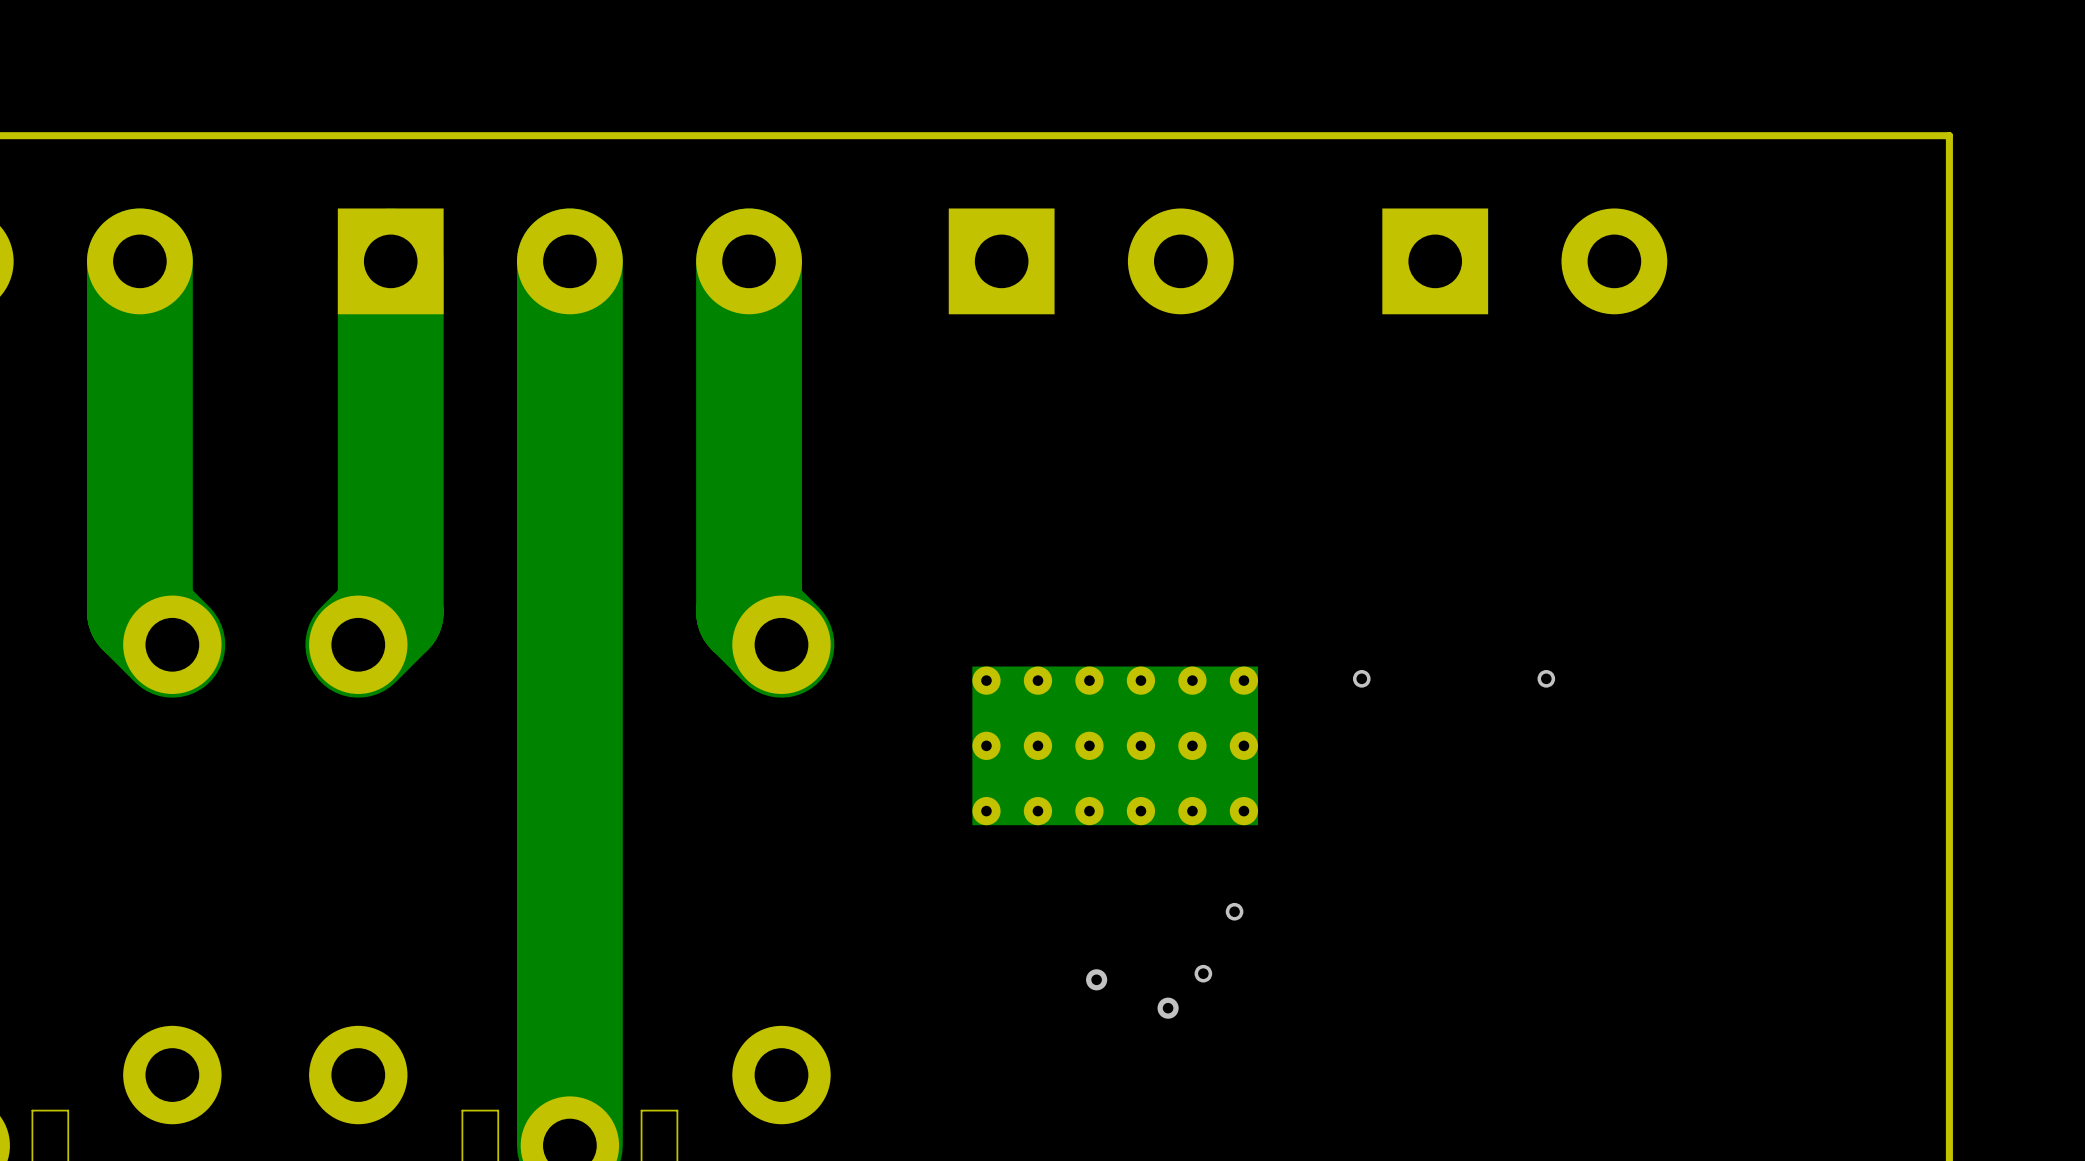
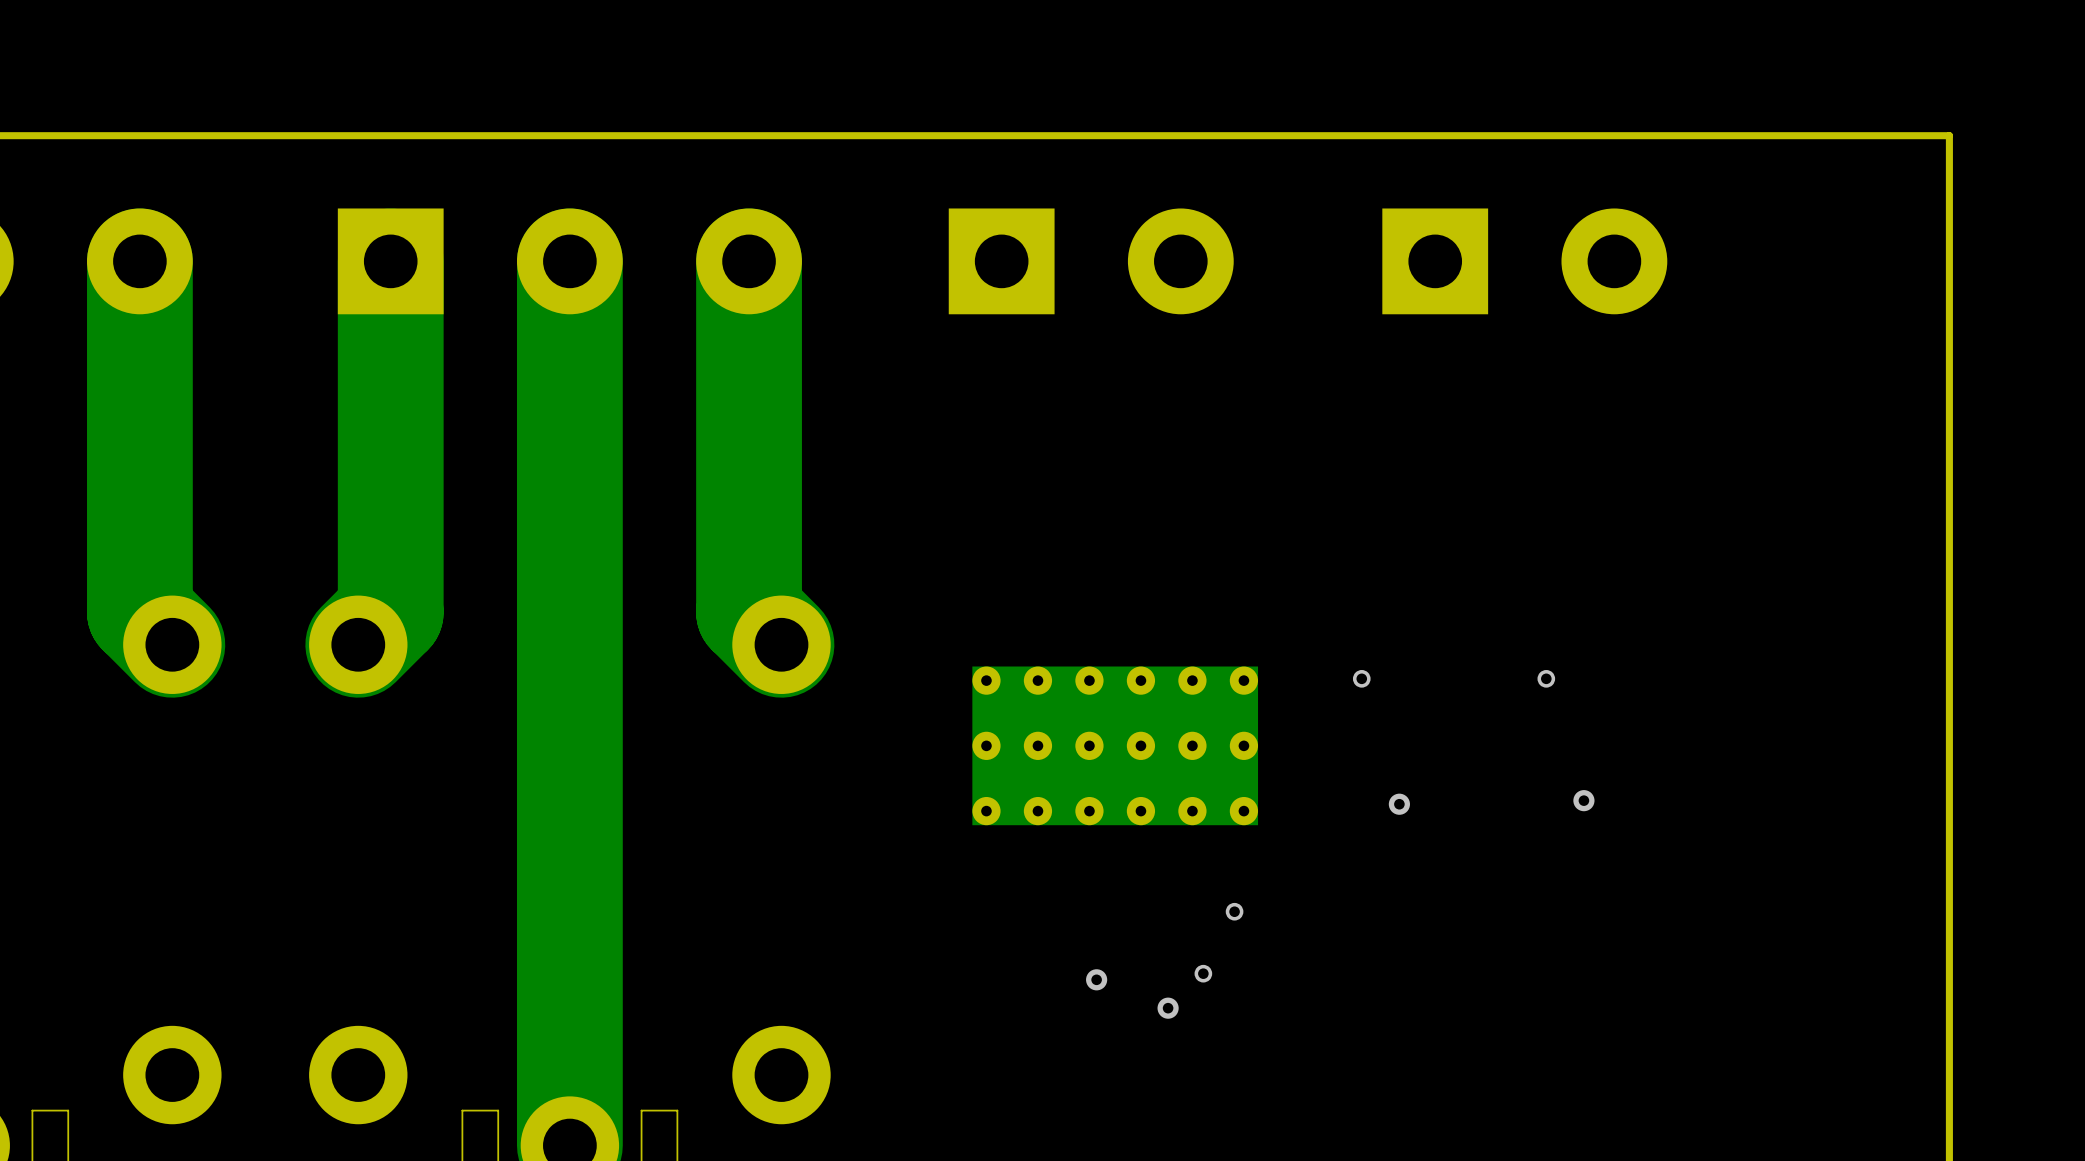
via: none -> (1583, 800)
via: none -> (1399, 804)

